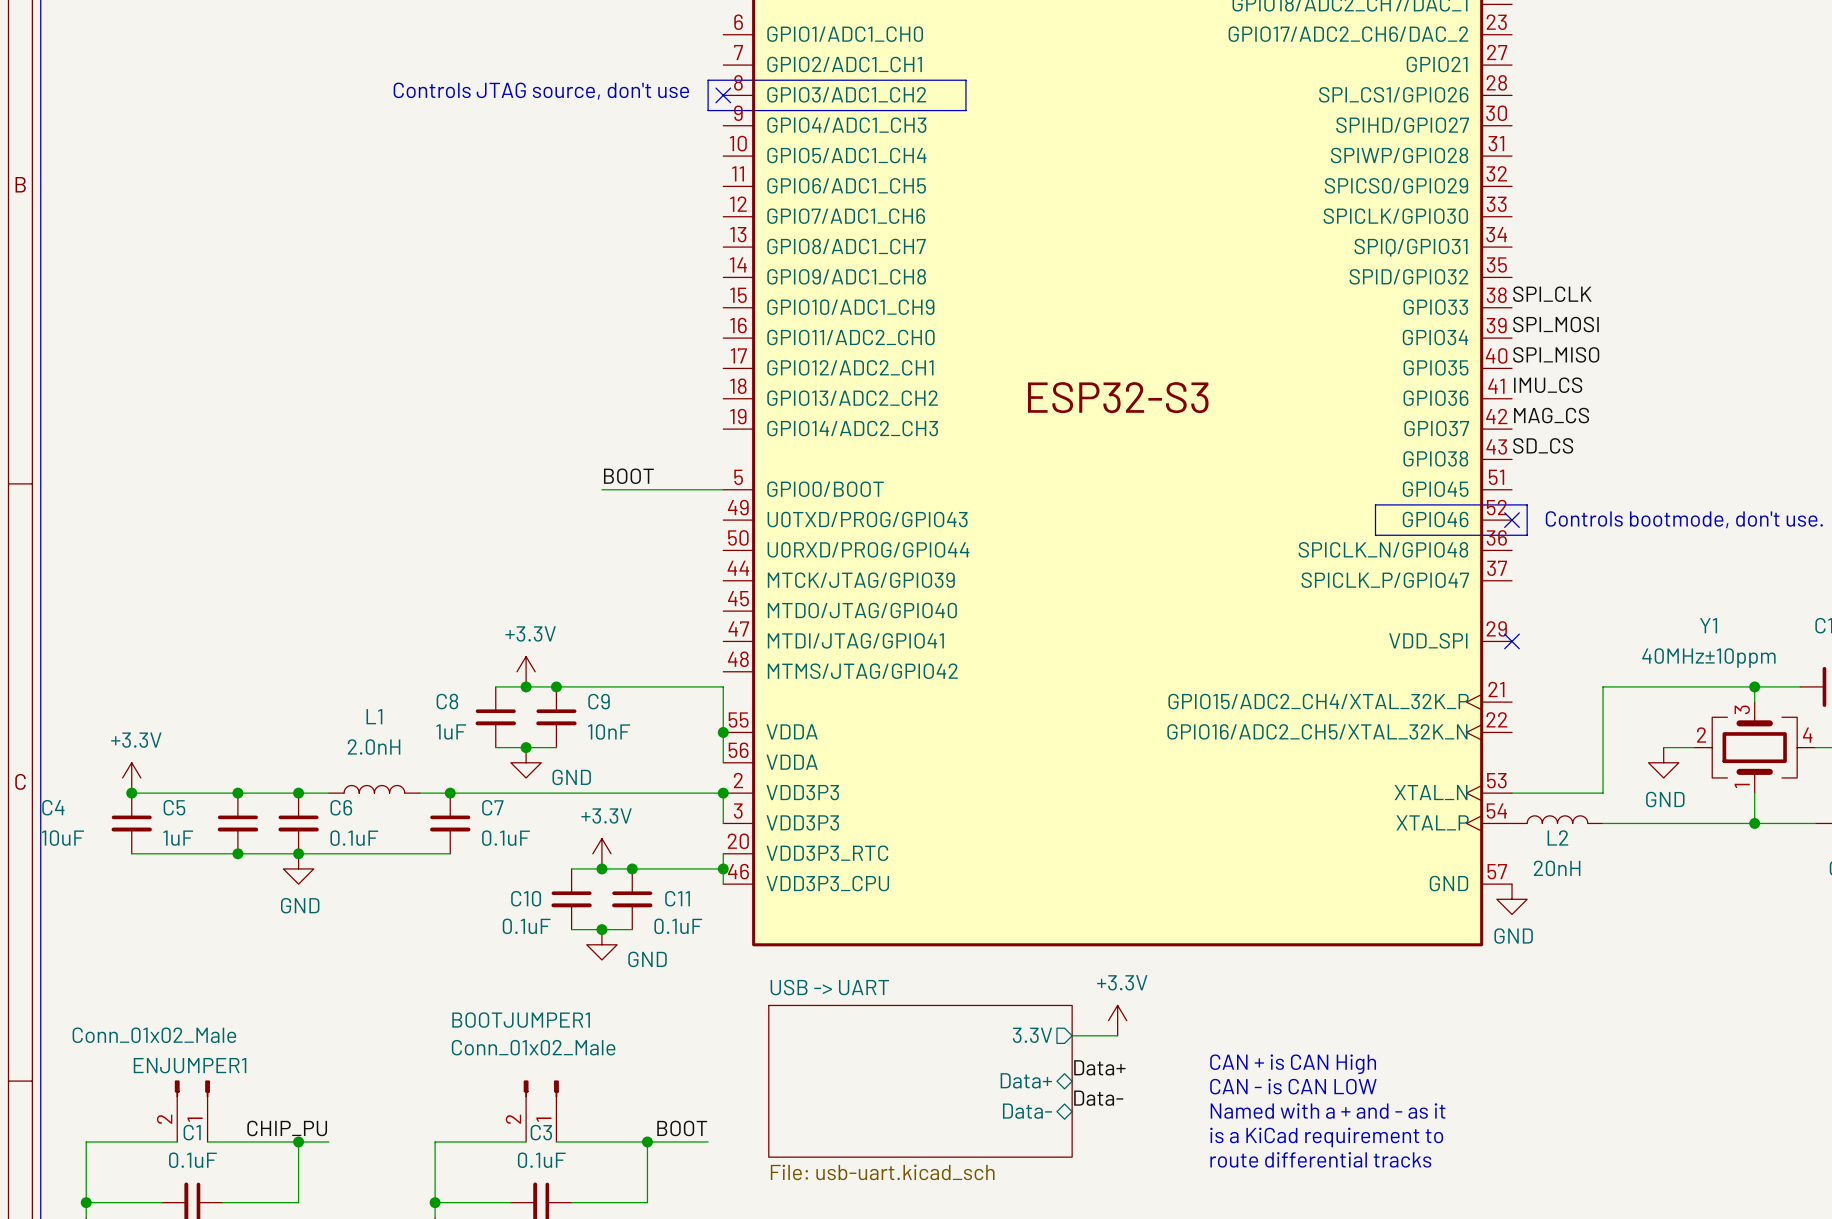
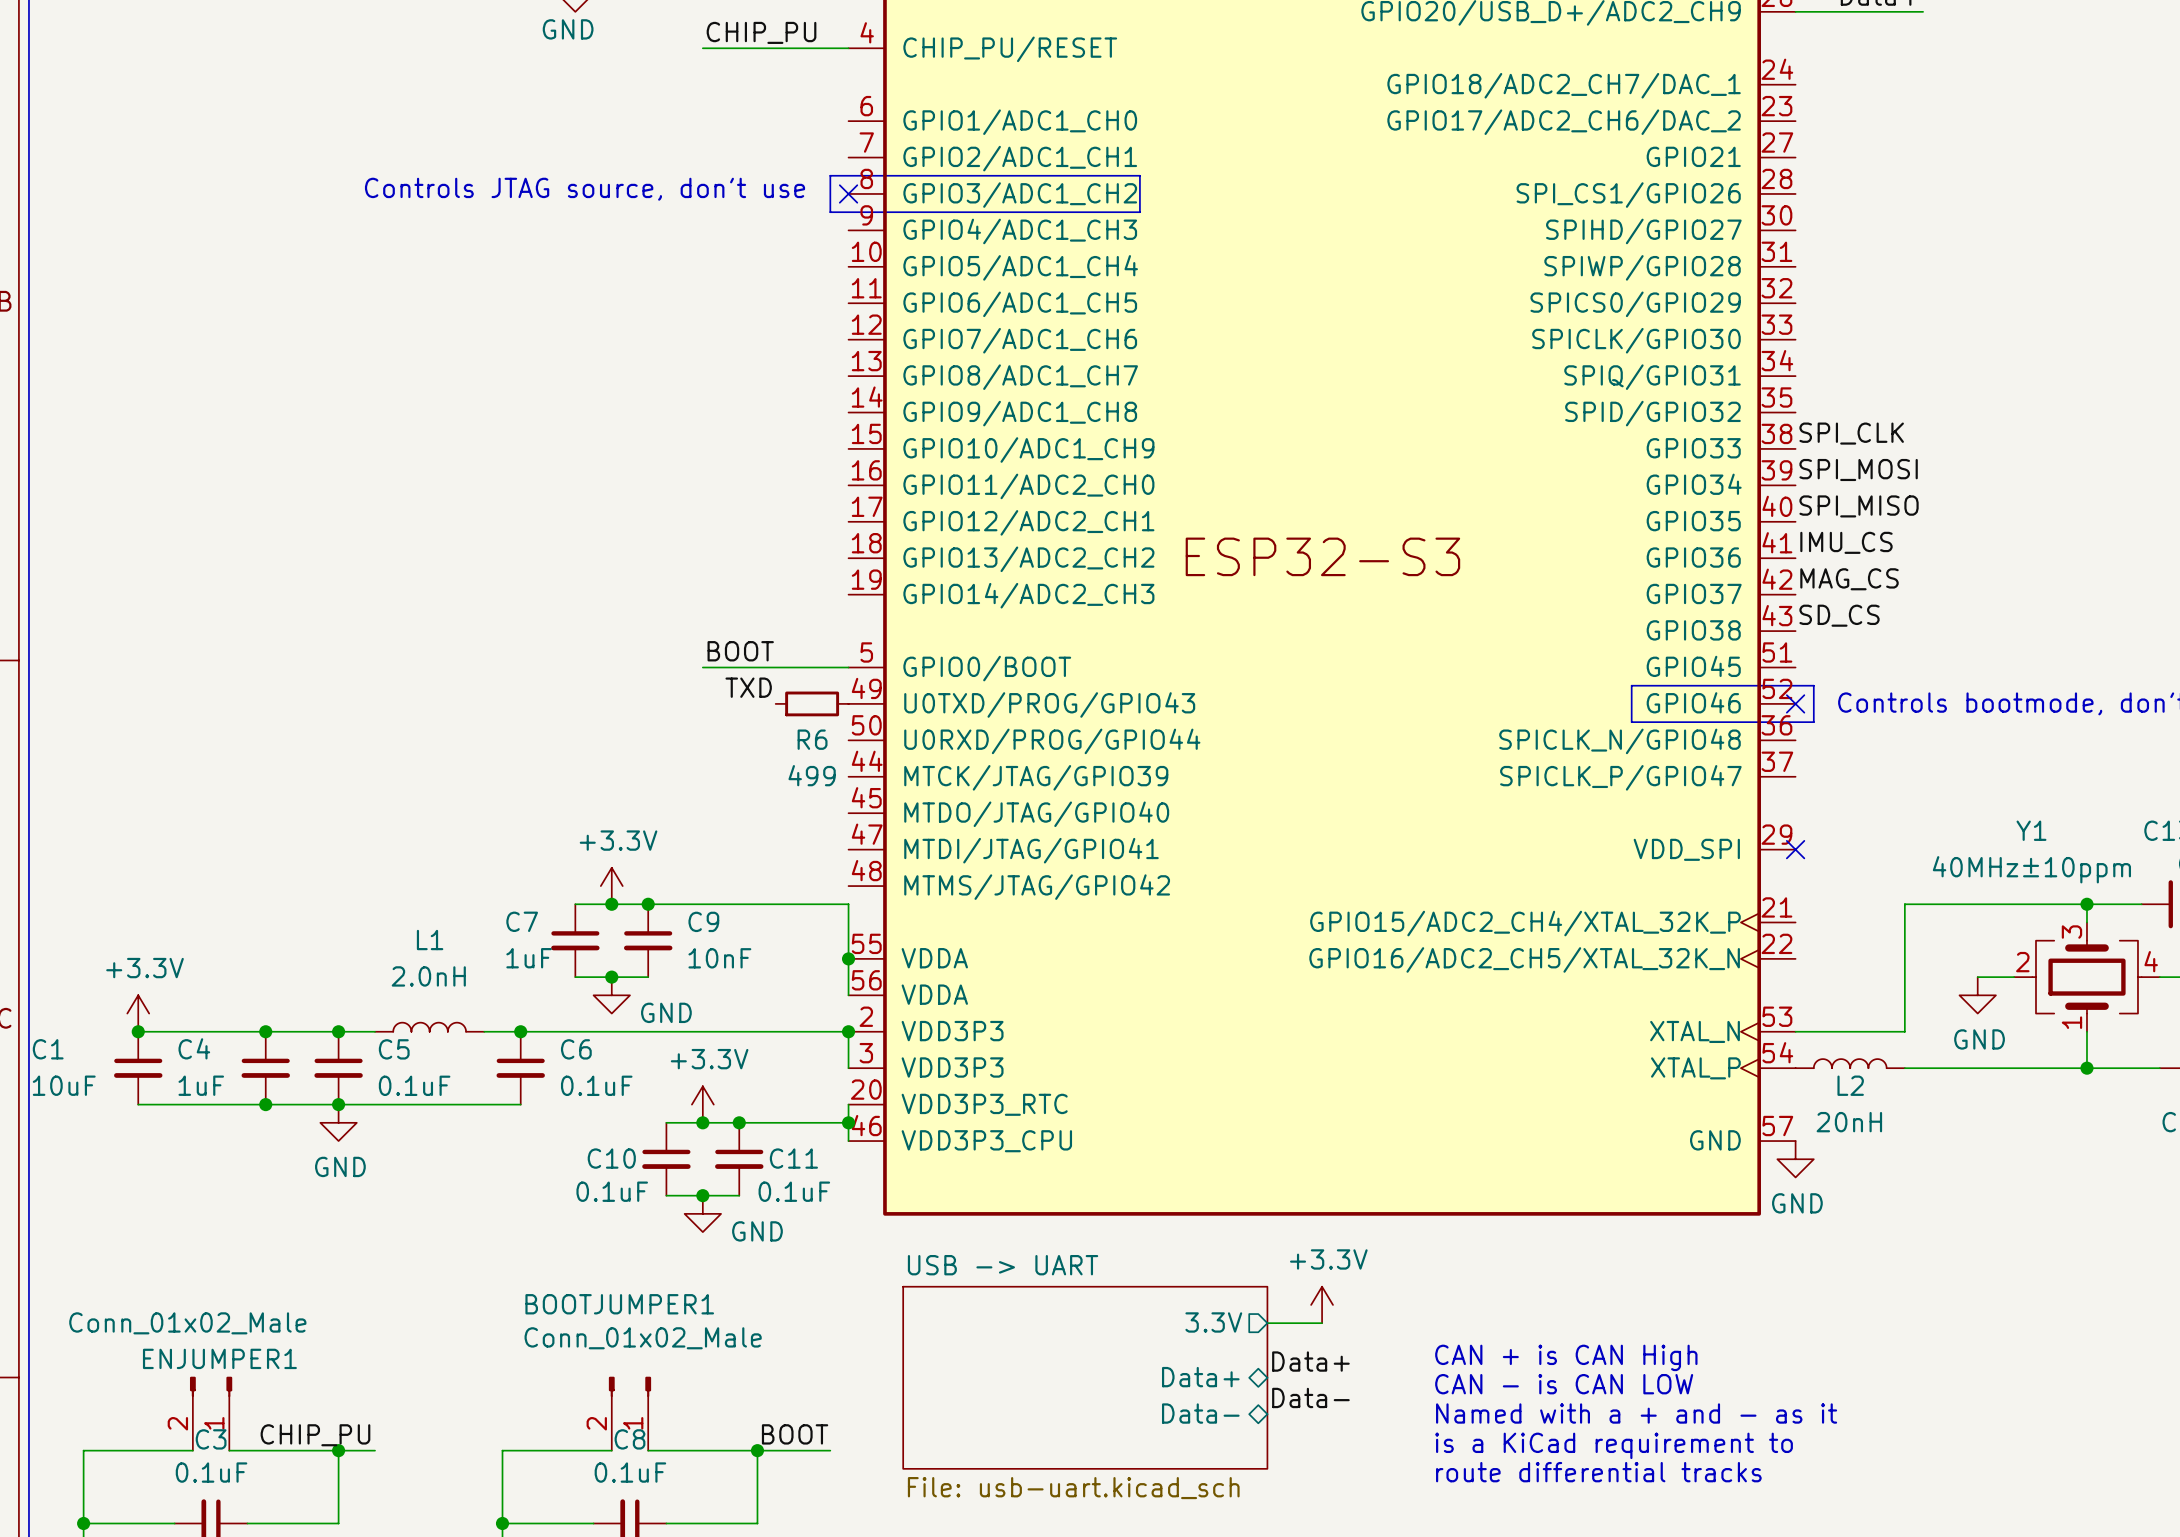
label: none -> TXD (748, 687)
R6: none -> 499 (812, 703)
C8 name: C8 (447, 701) -> C7 (522, 921)
C4 name: C4 (53, 807) -> C1 (48, 1049)
C5 name: C5 (174, 807) -> C4 (194, 1048)
C6 name: C6 (341, 807) -> C5 (394, 1049)
C7 name: C7 (492, 807) -> C6 (576, 1049)
C1 name: C1 (192, 1132) -> C3 (211, 1439)
C3 name: C3 (541, 1132) -> C8 (629, 1439)

